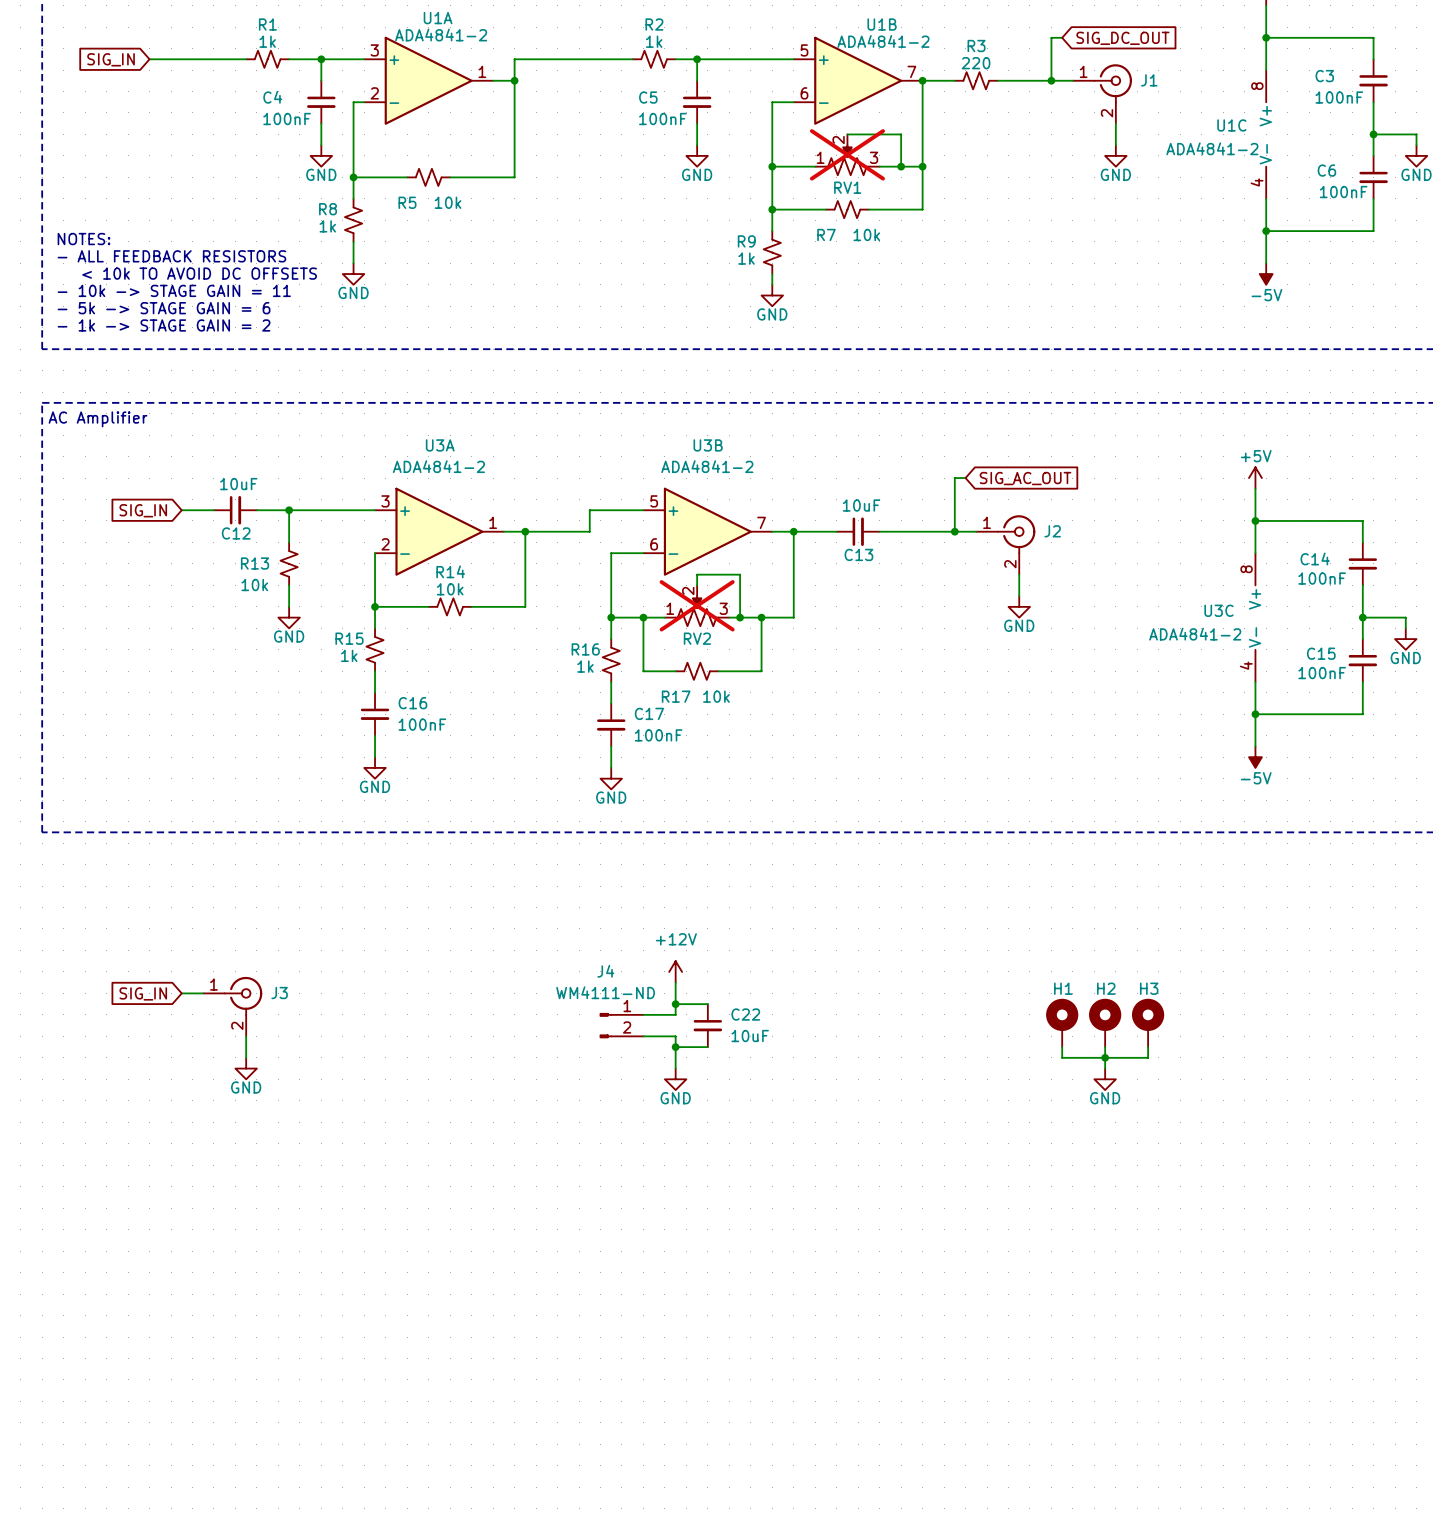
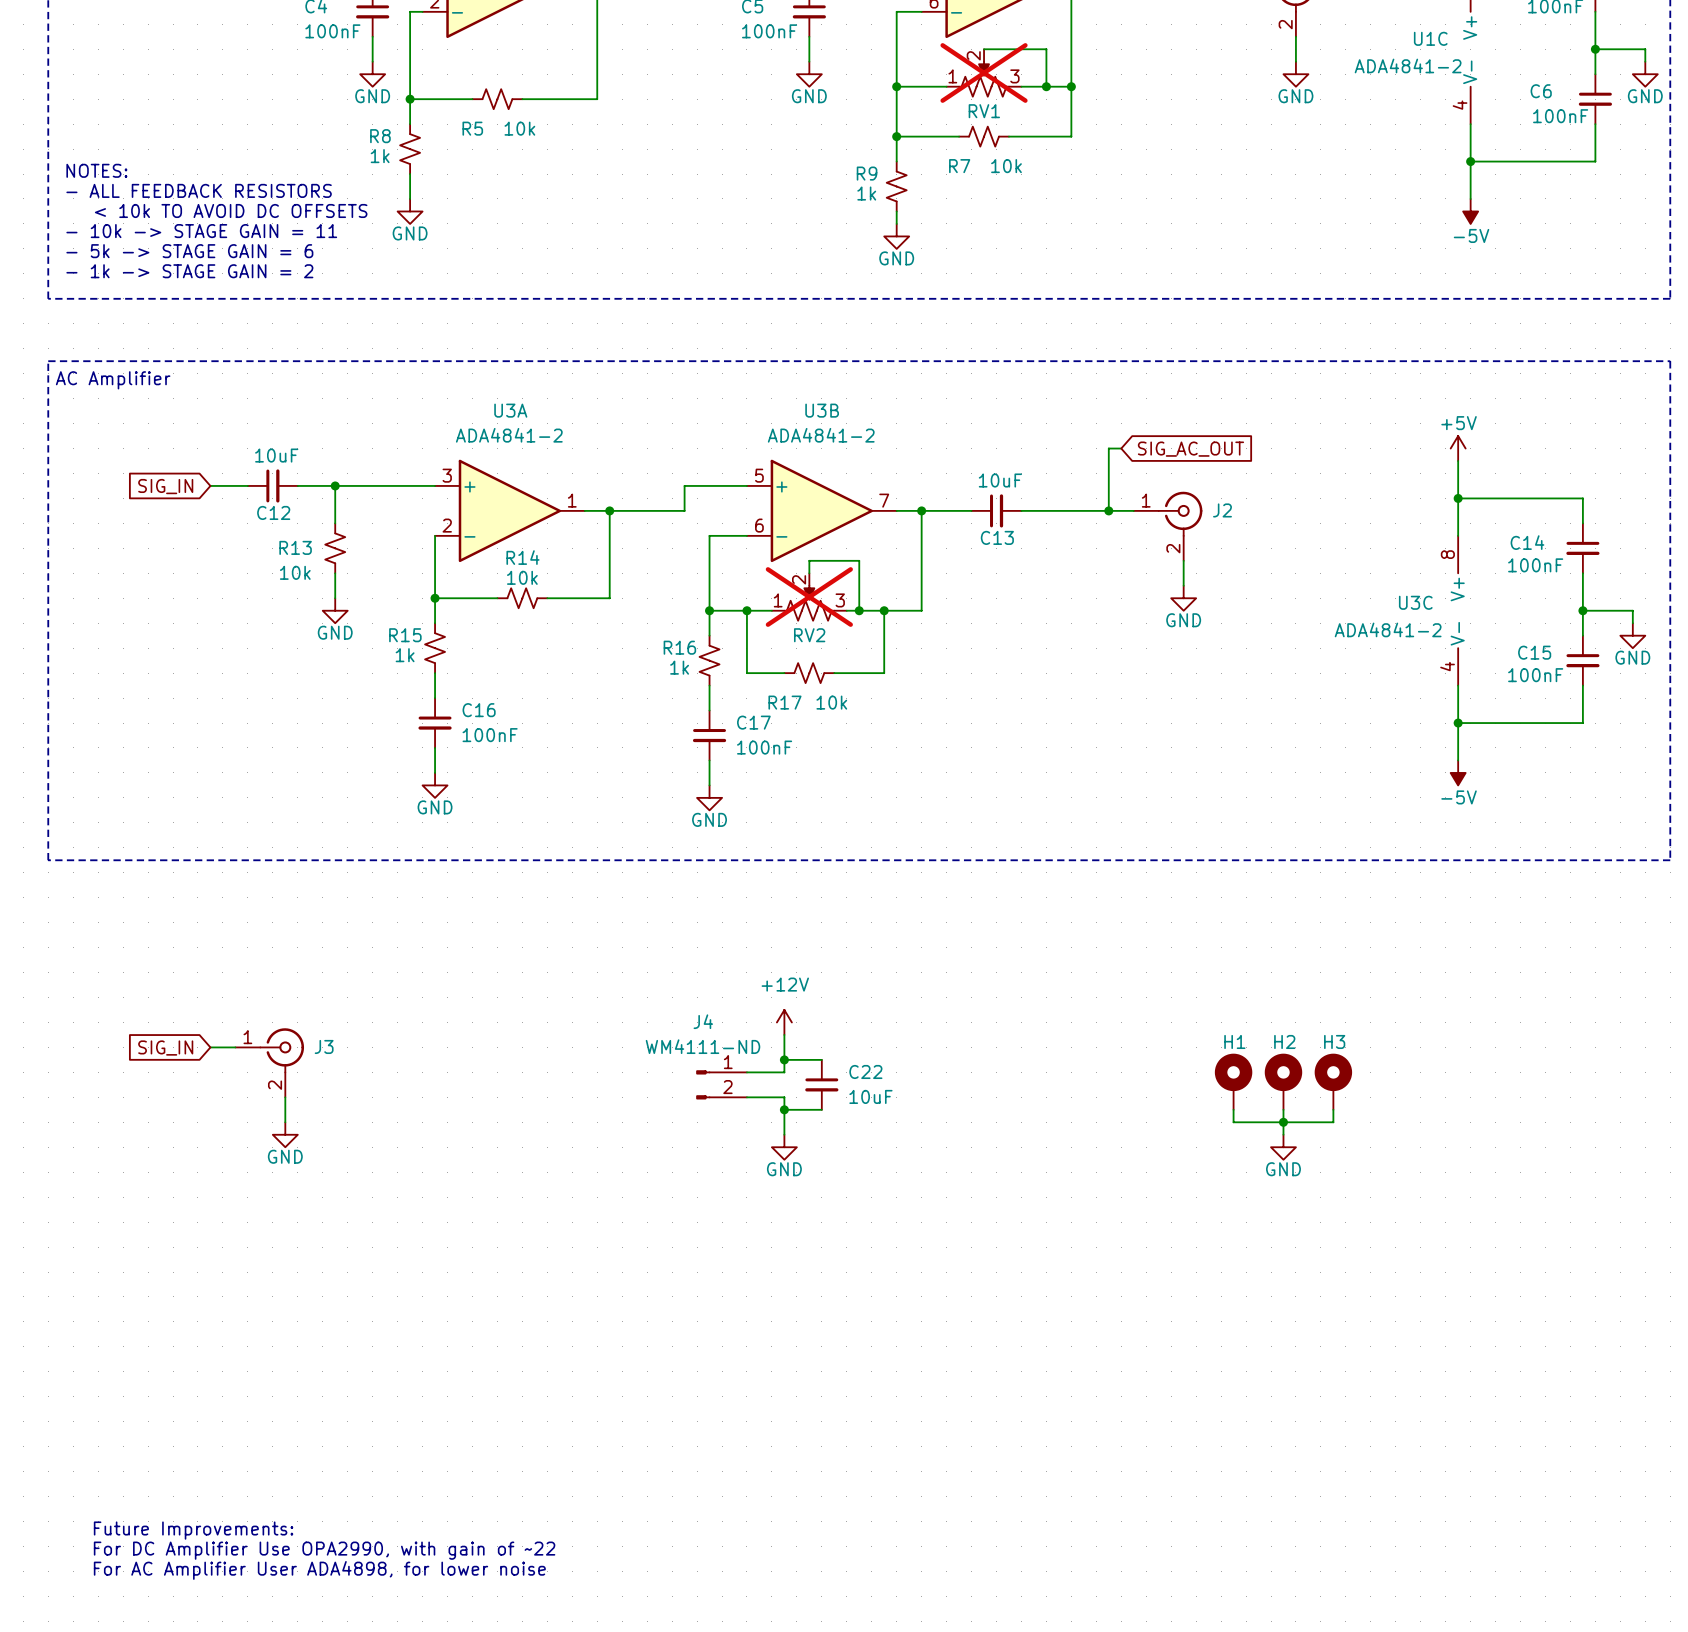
text: none -> Future Improvements: (193, 1530)
text: none -> For DC Amplifier Use OPA2990, with gain of ~22 (324, 1550)
text: none -> For AC Amplifier User ADA4898, for lower noise (319, 1570)

